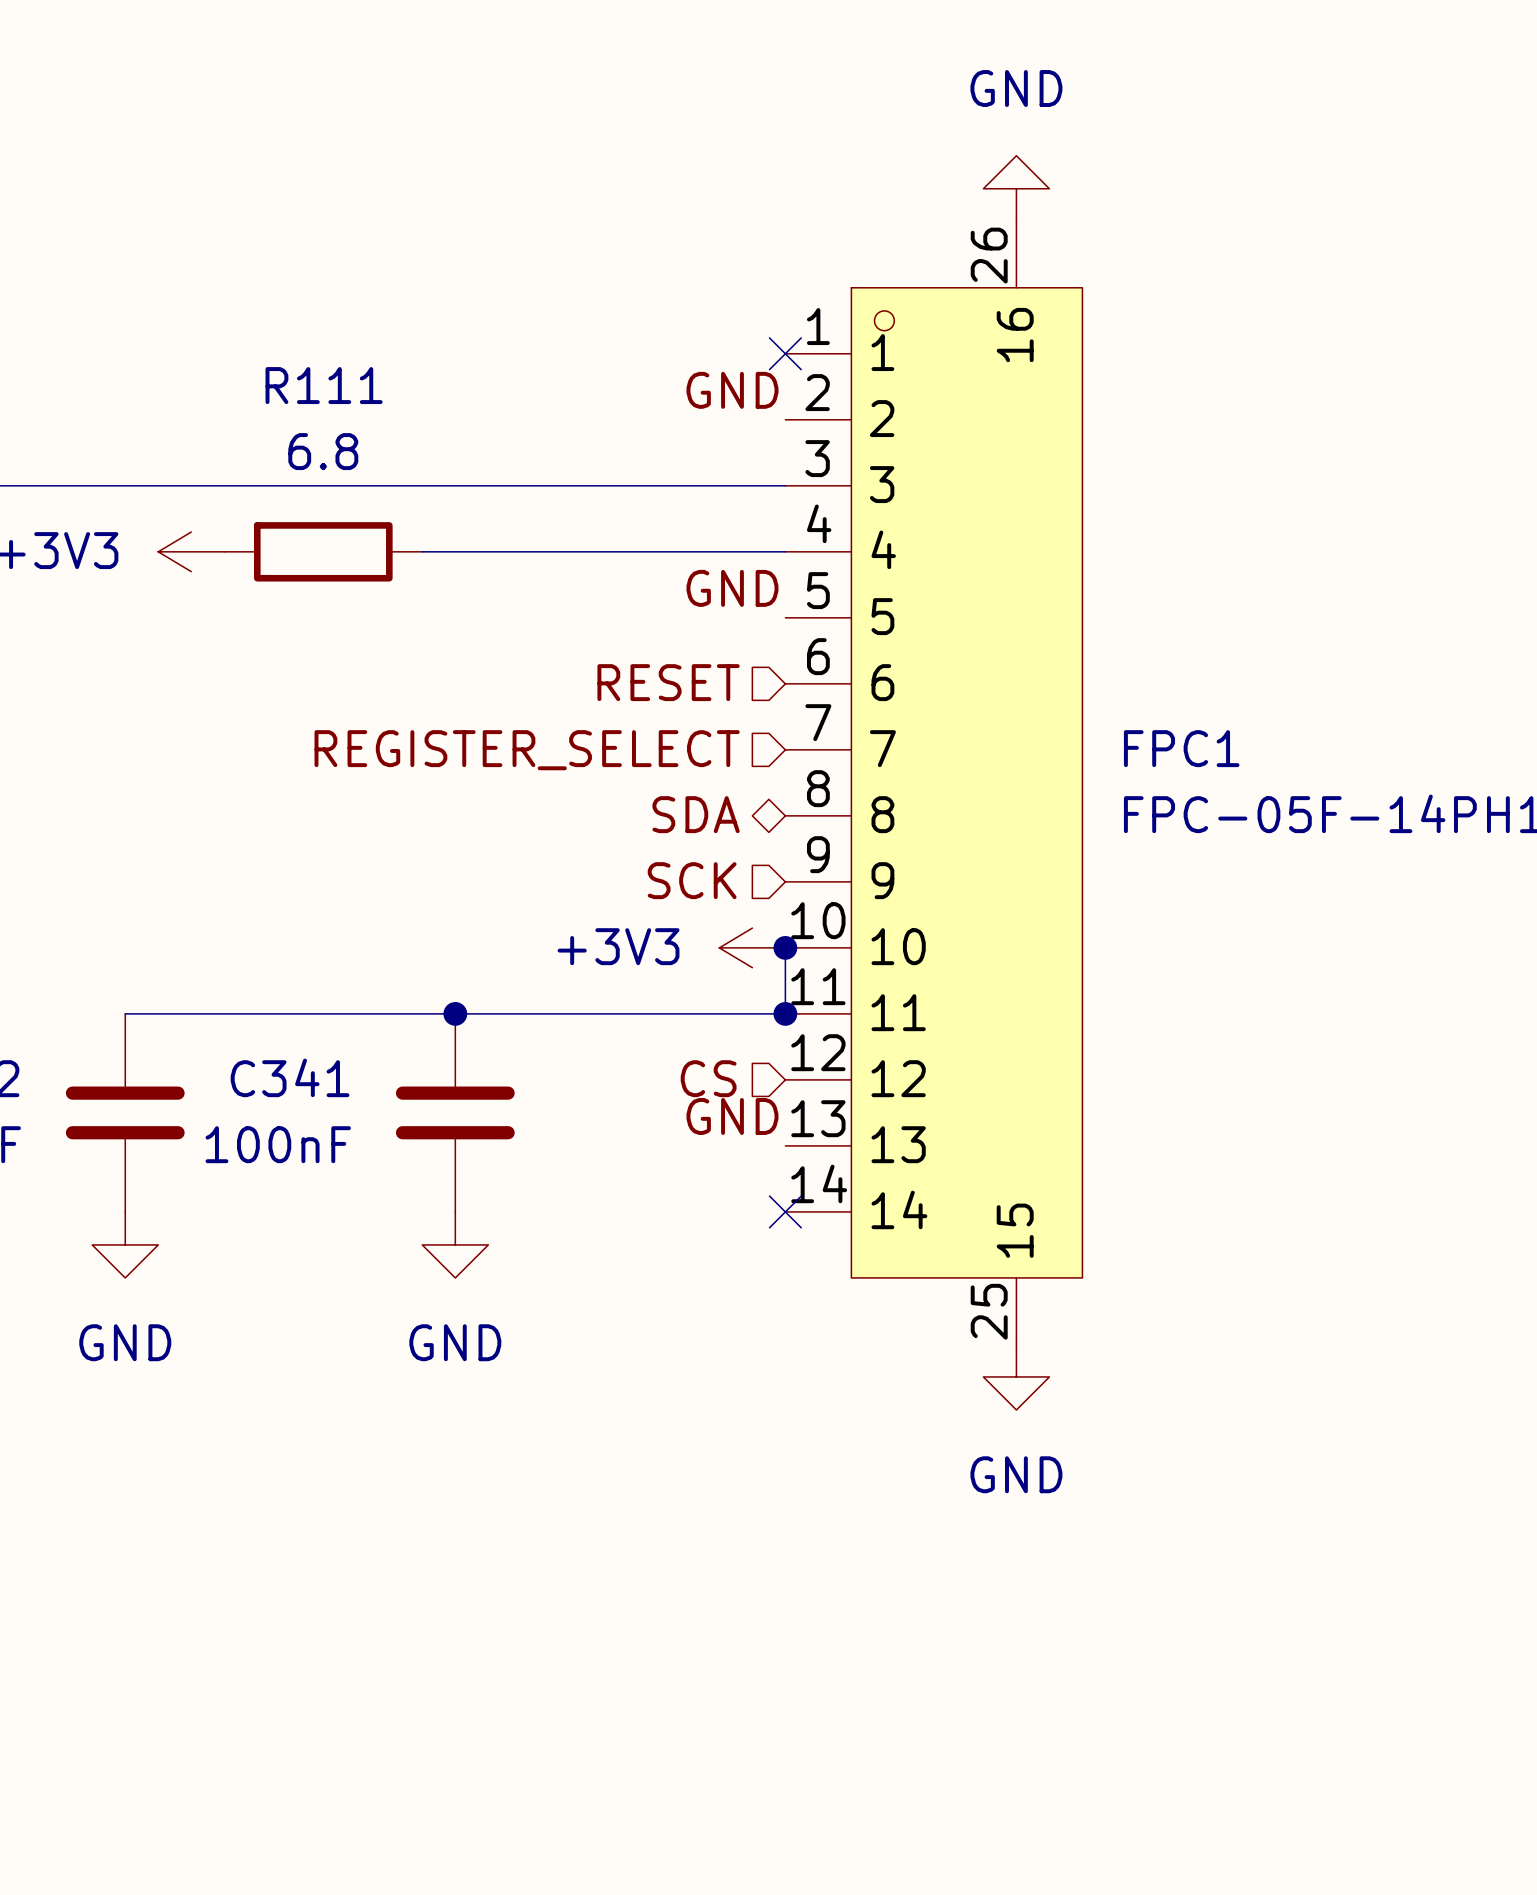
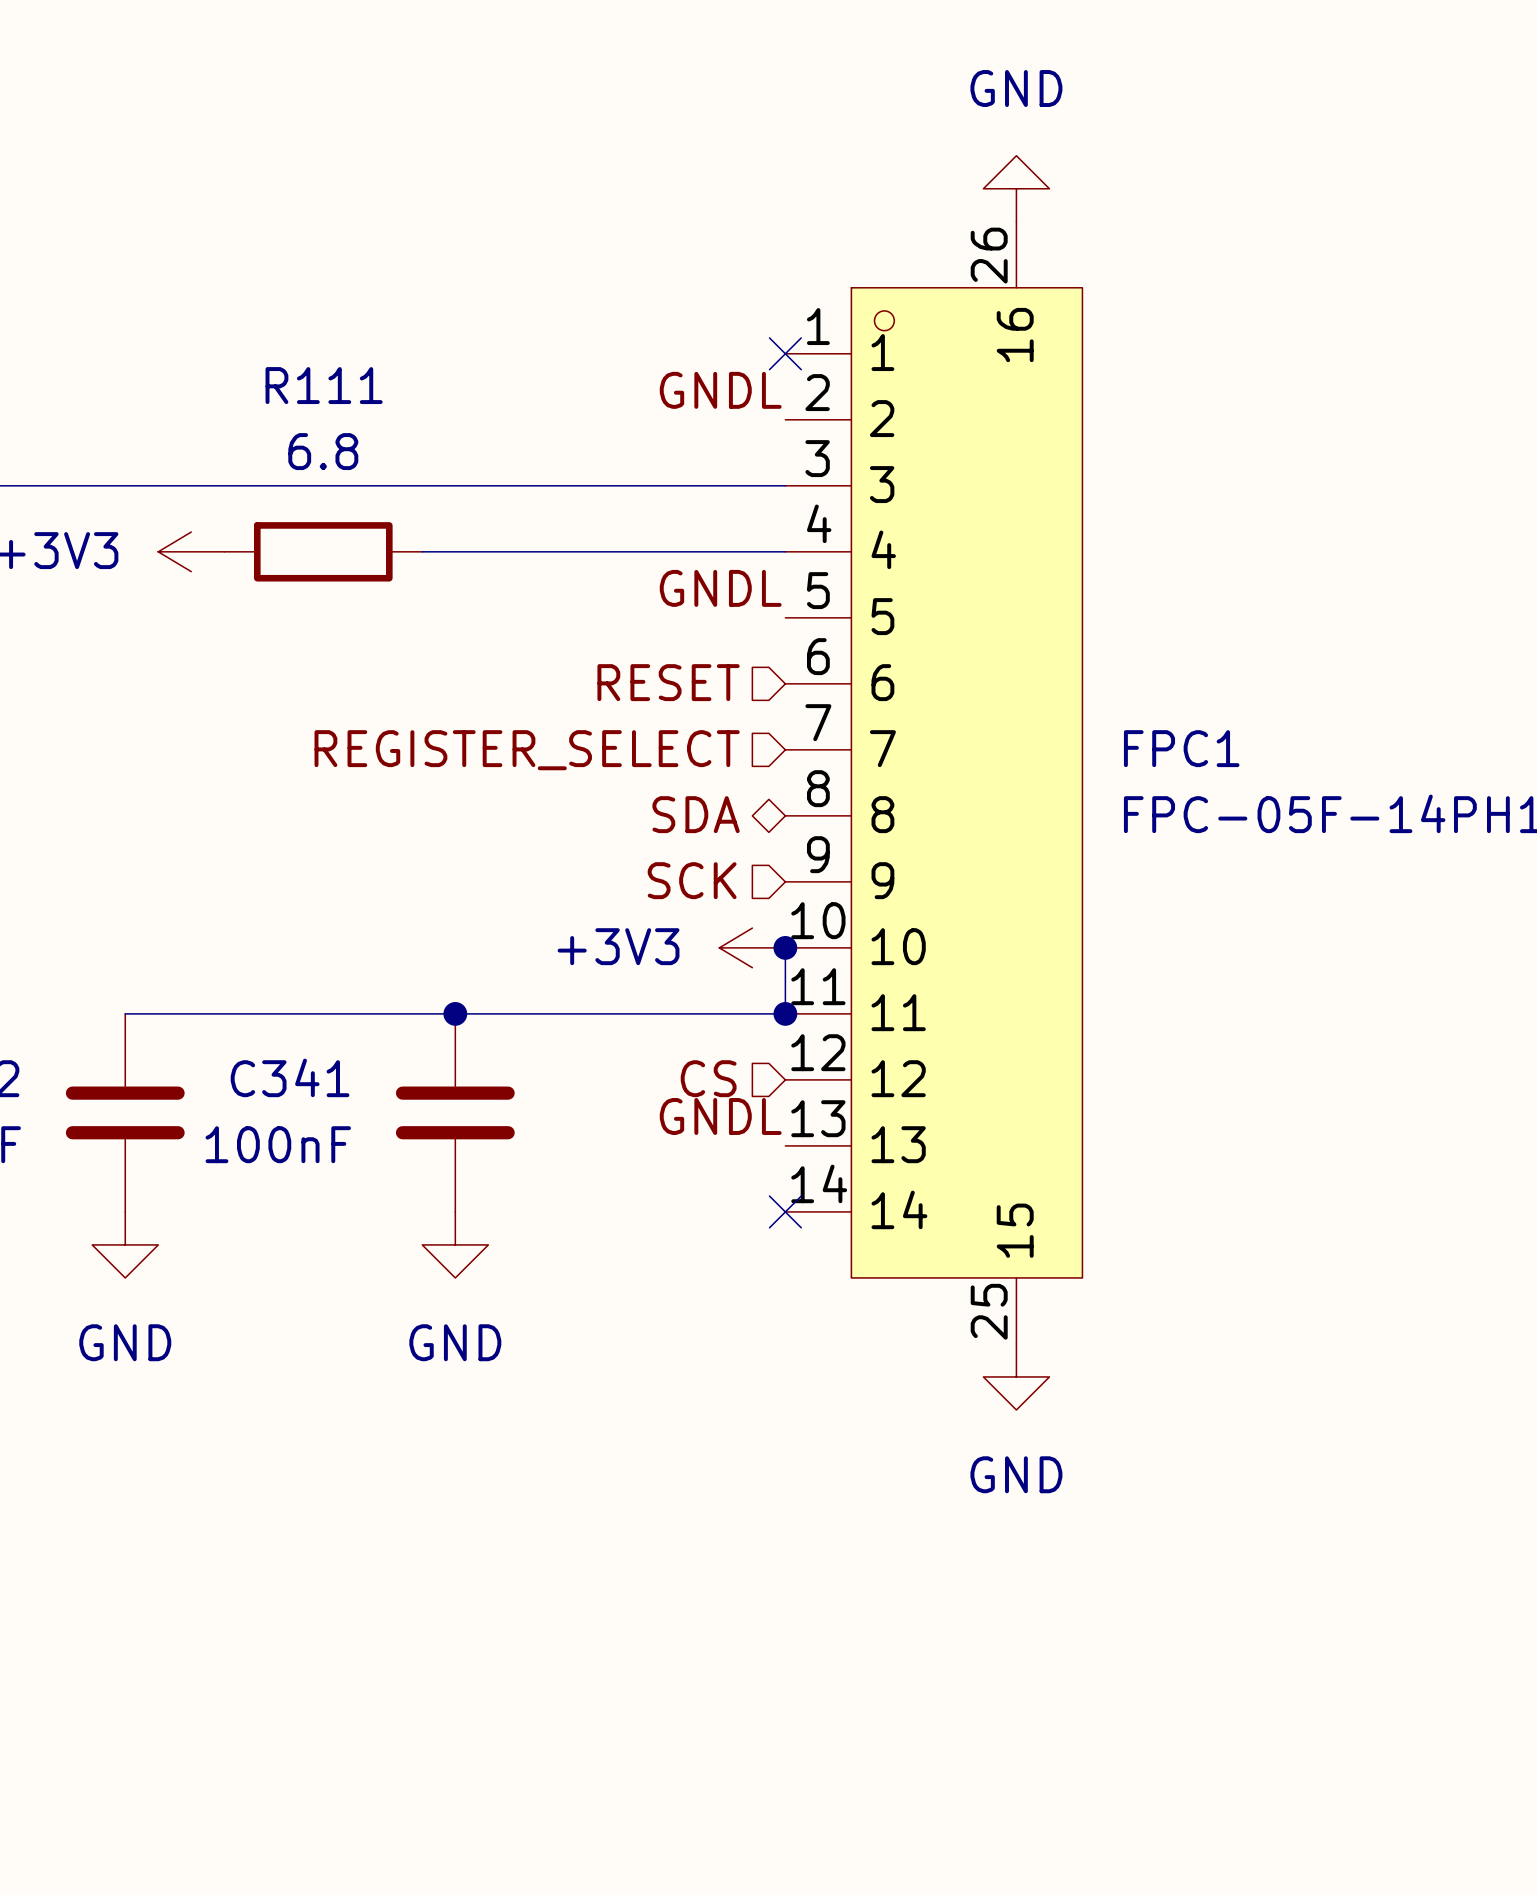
label: GND (732, 390) -> GNDL (720, 390)
label: GND (732, 588) -> GNDL (720, 588)
label: GND (732, 1116) -> GNDL (720, 1116)

